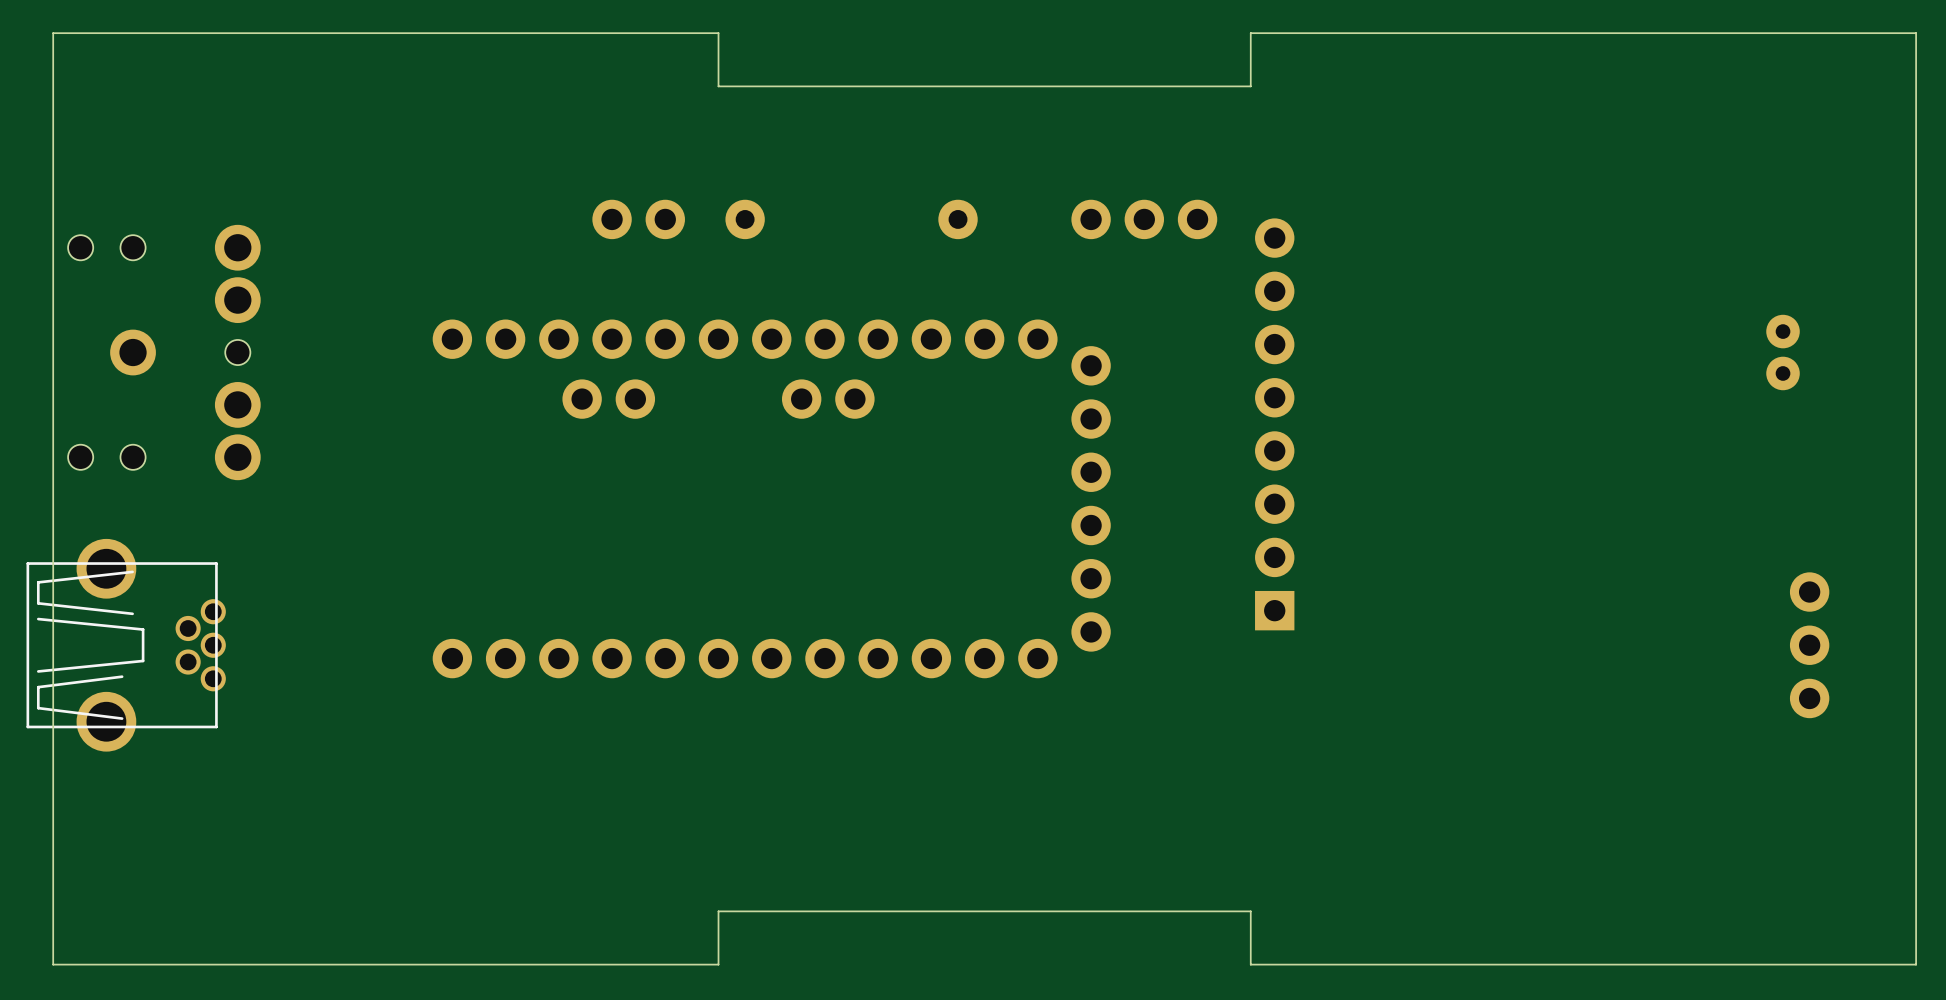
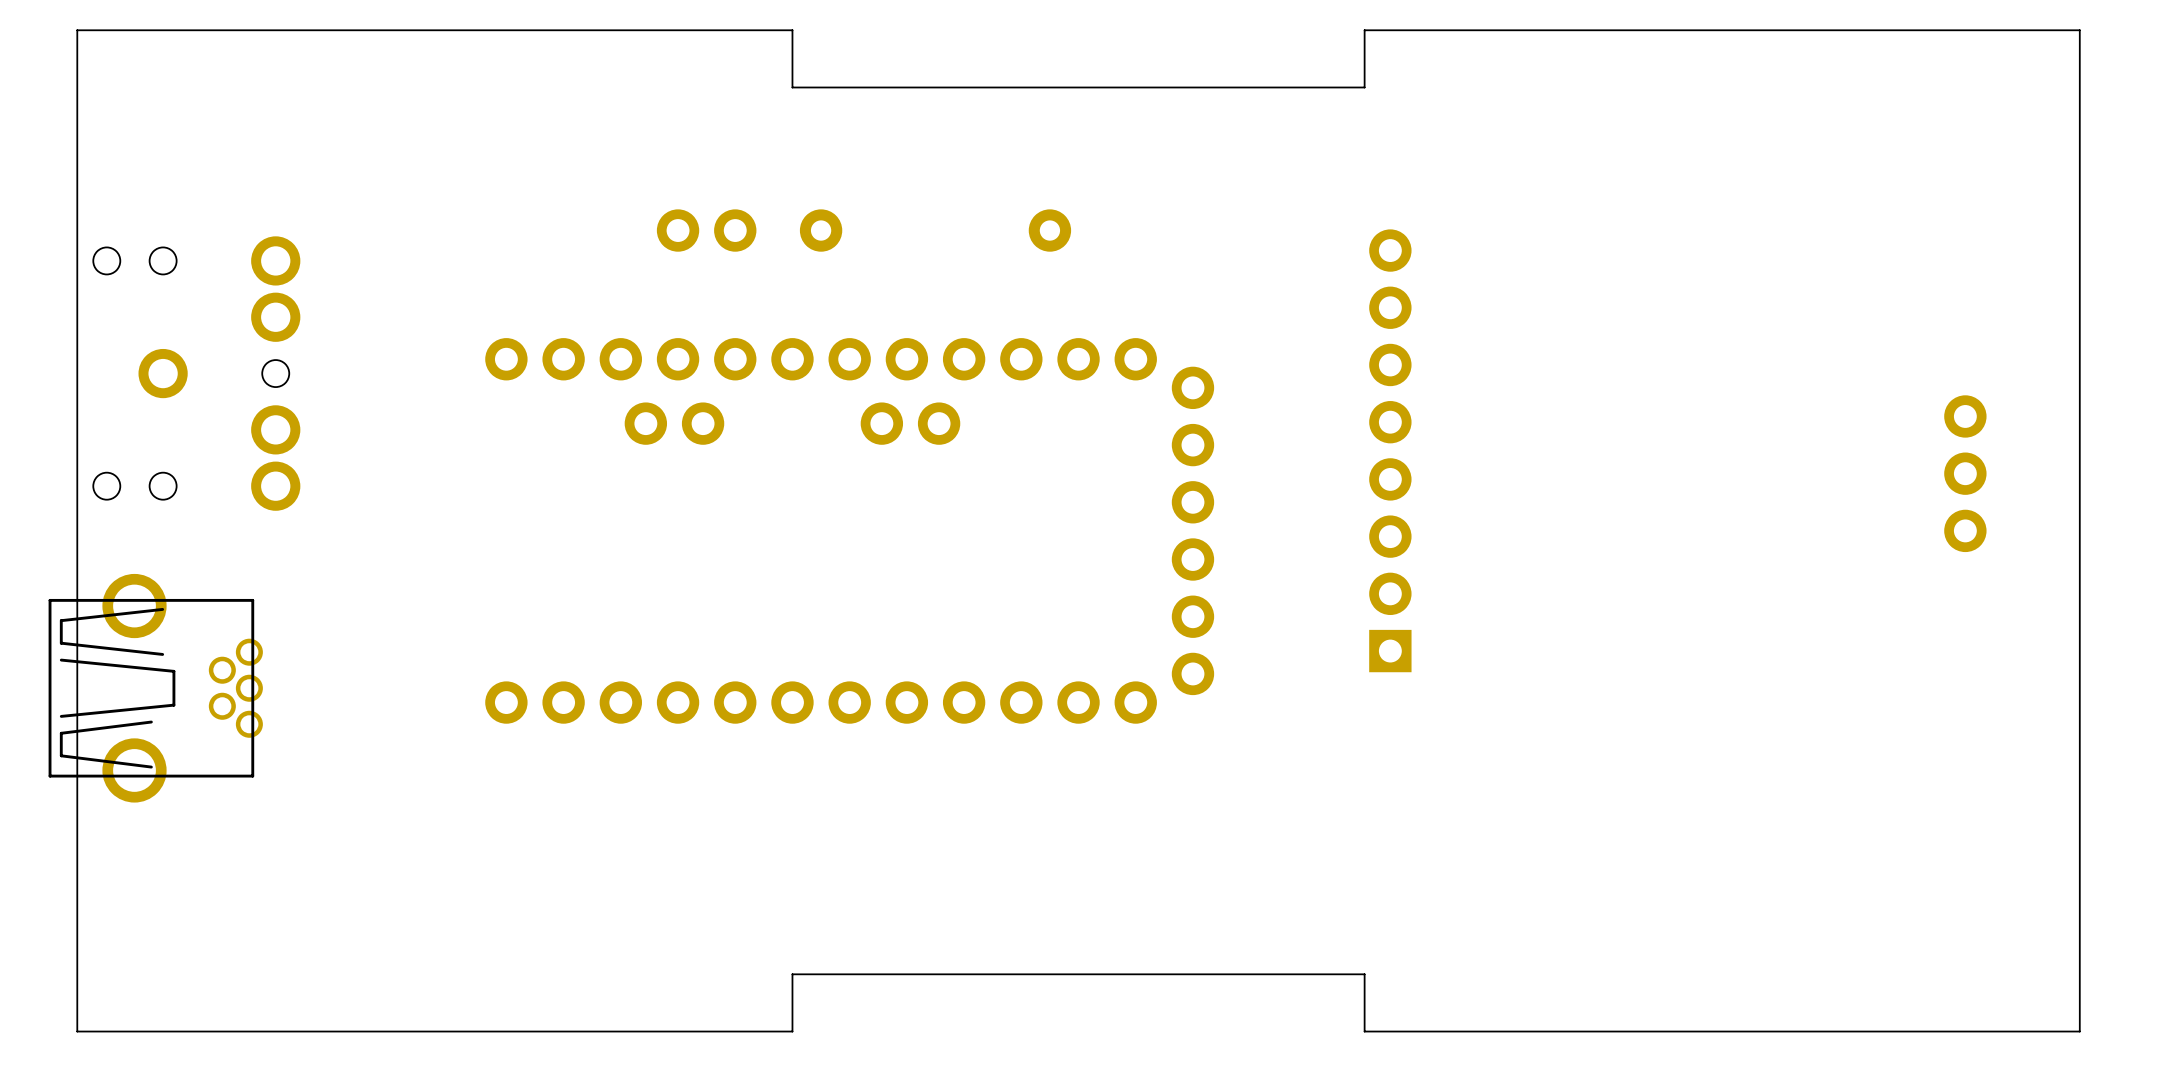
part: (1144, 219) -> none
part: (1783, 352) -> none
part position: (1809, 645) -> (1965, 473)

